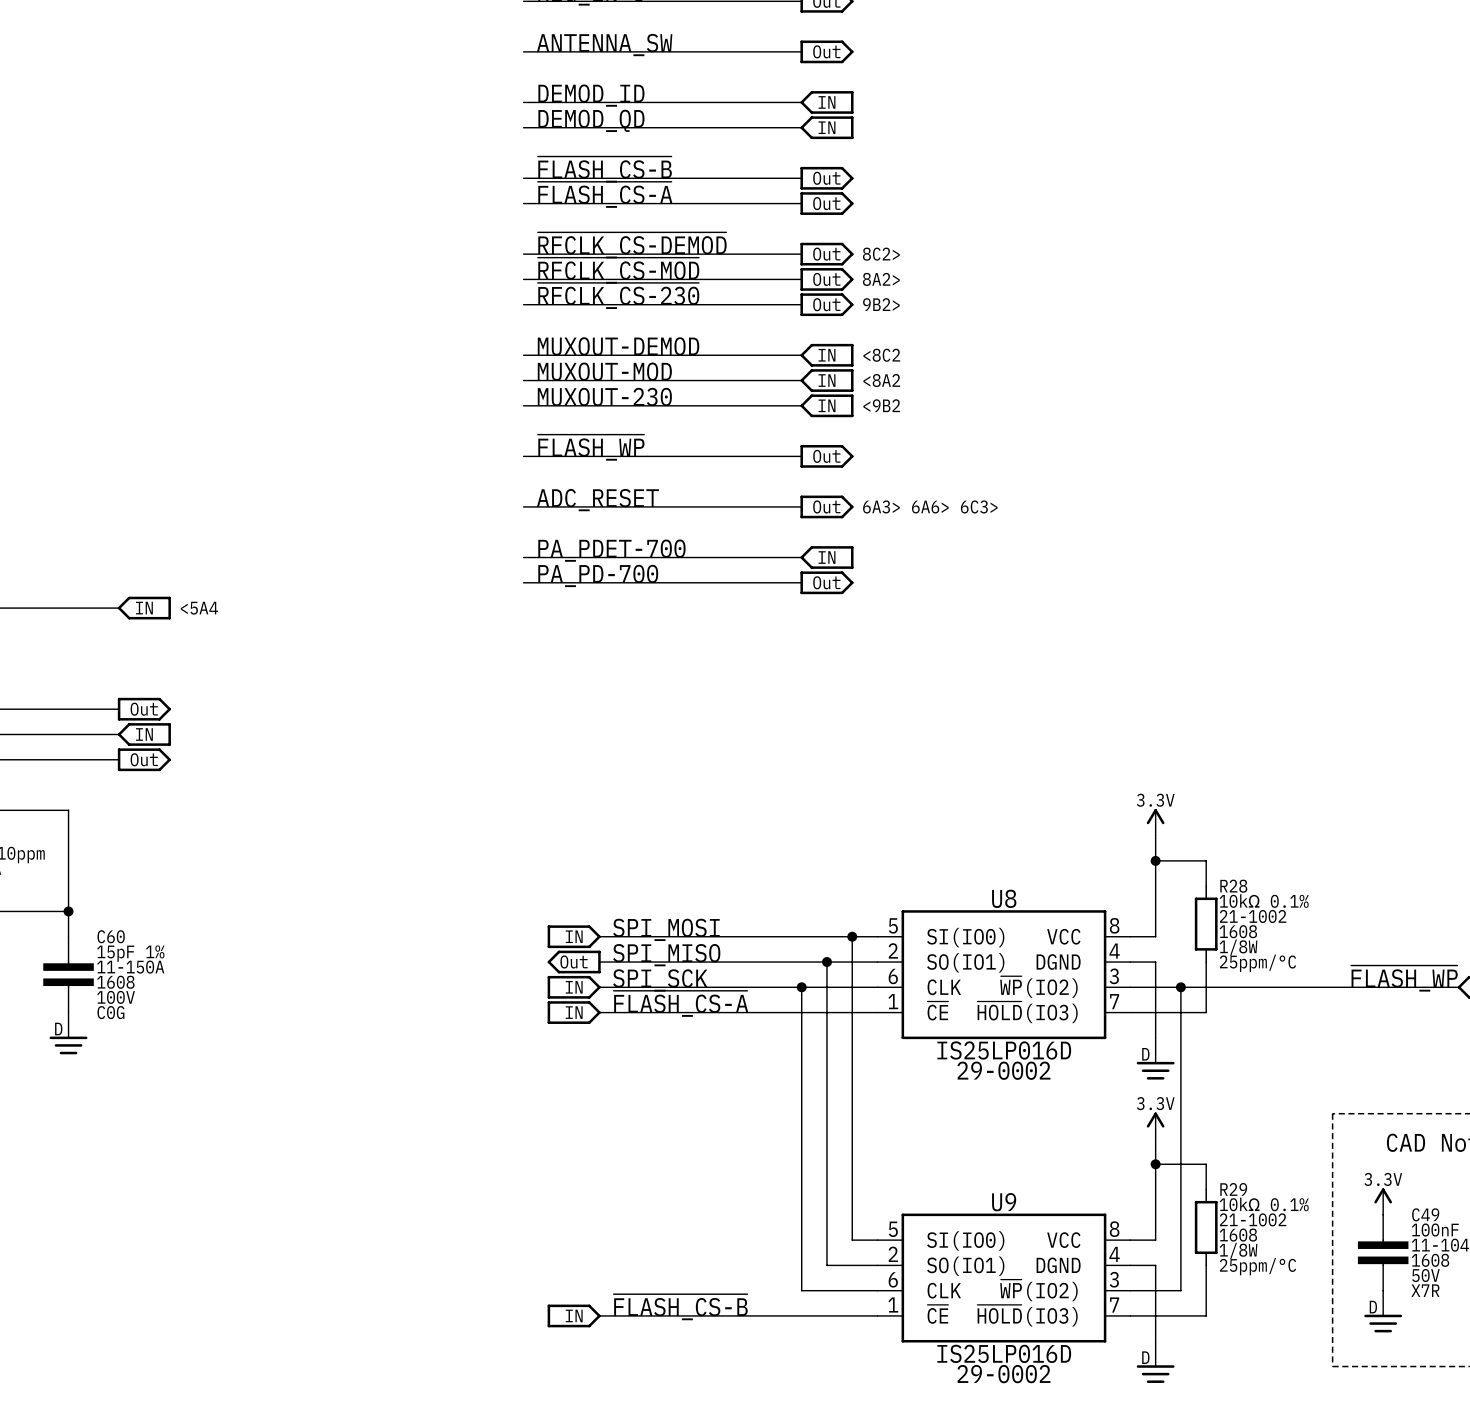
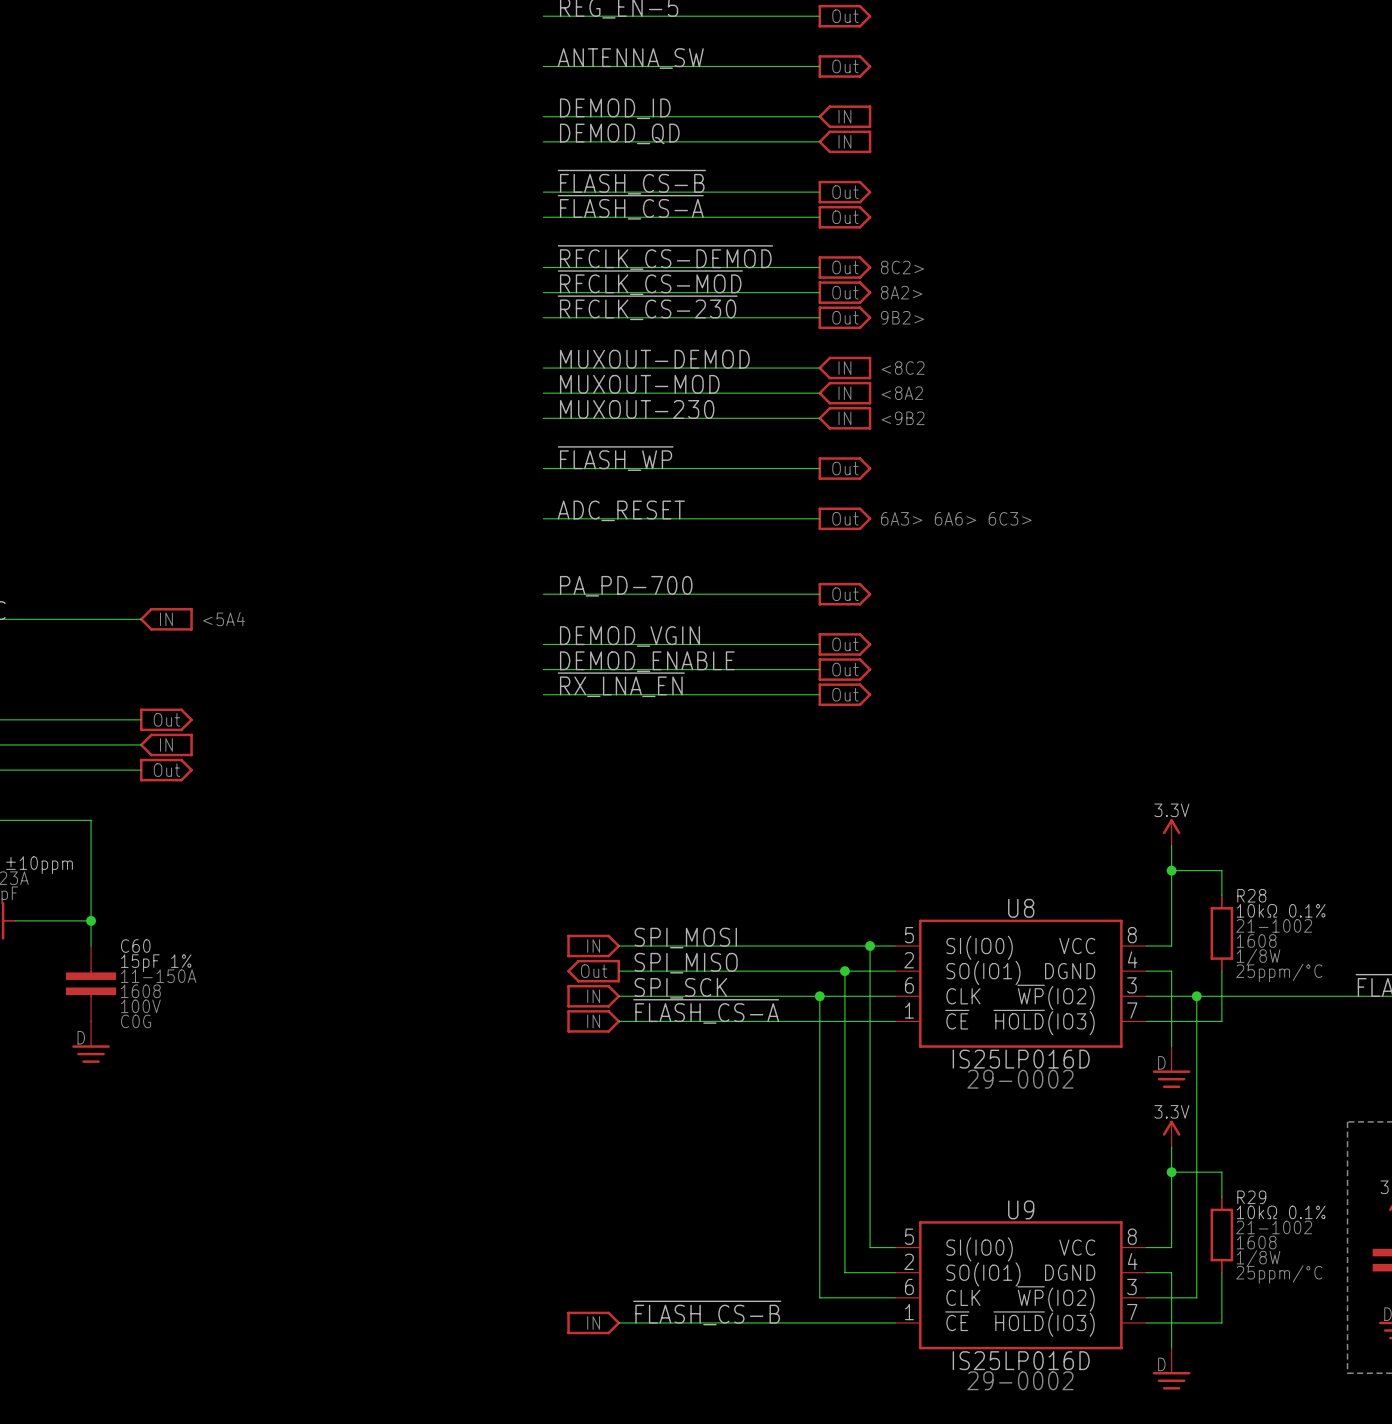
label: PA_PDET-700 (611, 550) -> none
wire: (523, 557) (801, 557) -> (543, 644) (819, 644)
part: (826, 557) -> none
label: none -> DEMOD_VGIN (629, 636)
part: none -> (844, 644)
label: none -> DEMOD_ENABLE (647, 661)
wire: none -> (543, 669) (819, 669)
part: none -> (844, 669)
label: none -> ~{RX_LNA_EN} (621, 684)
wire: none -> (543, 694) (819, 694)
part: none -> (844, 694)

